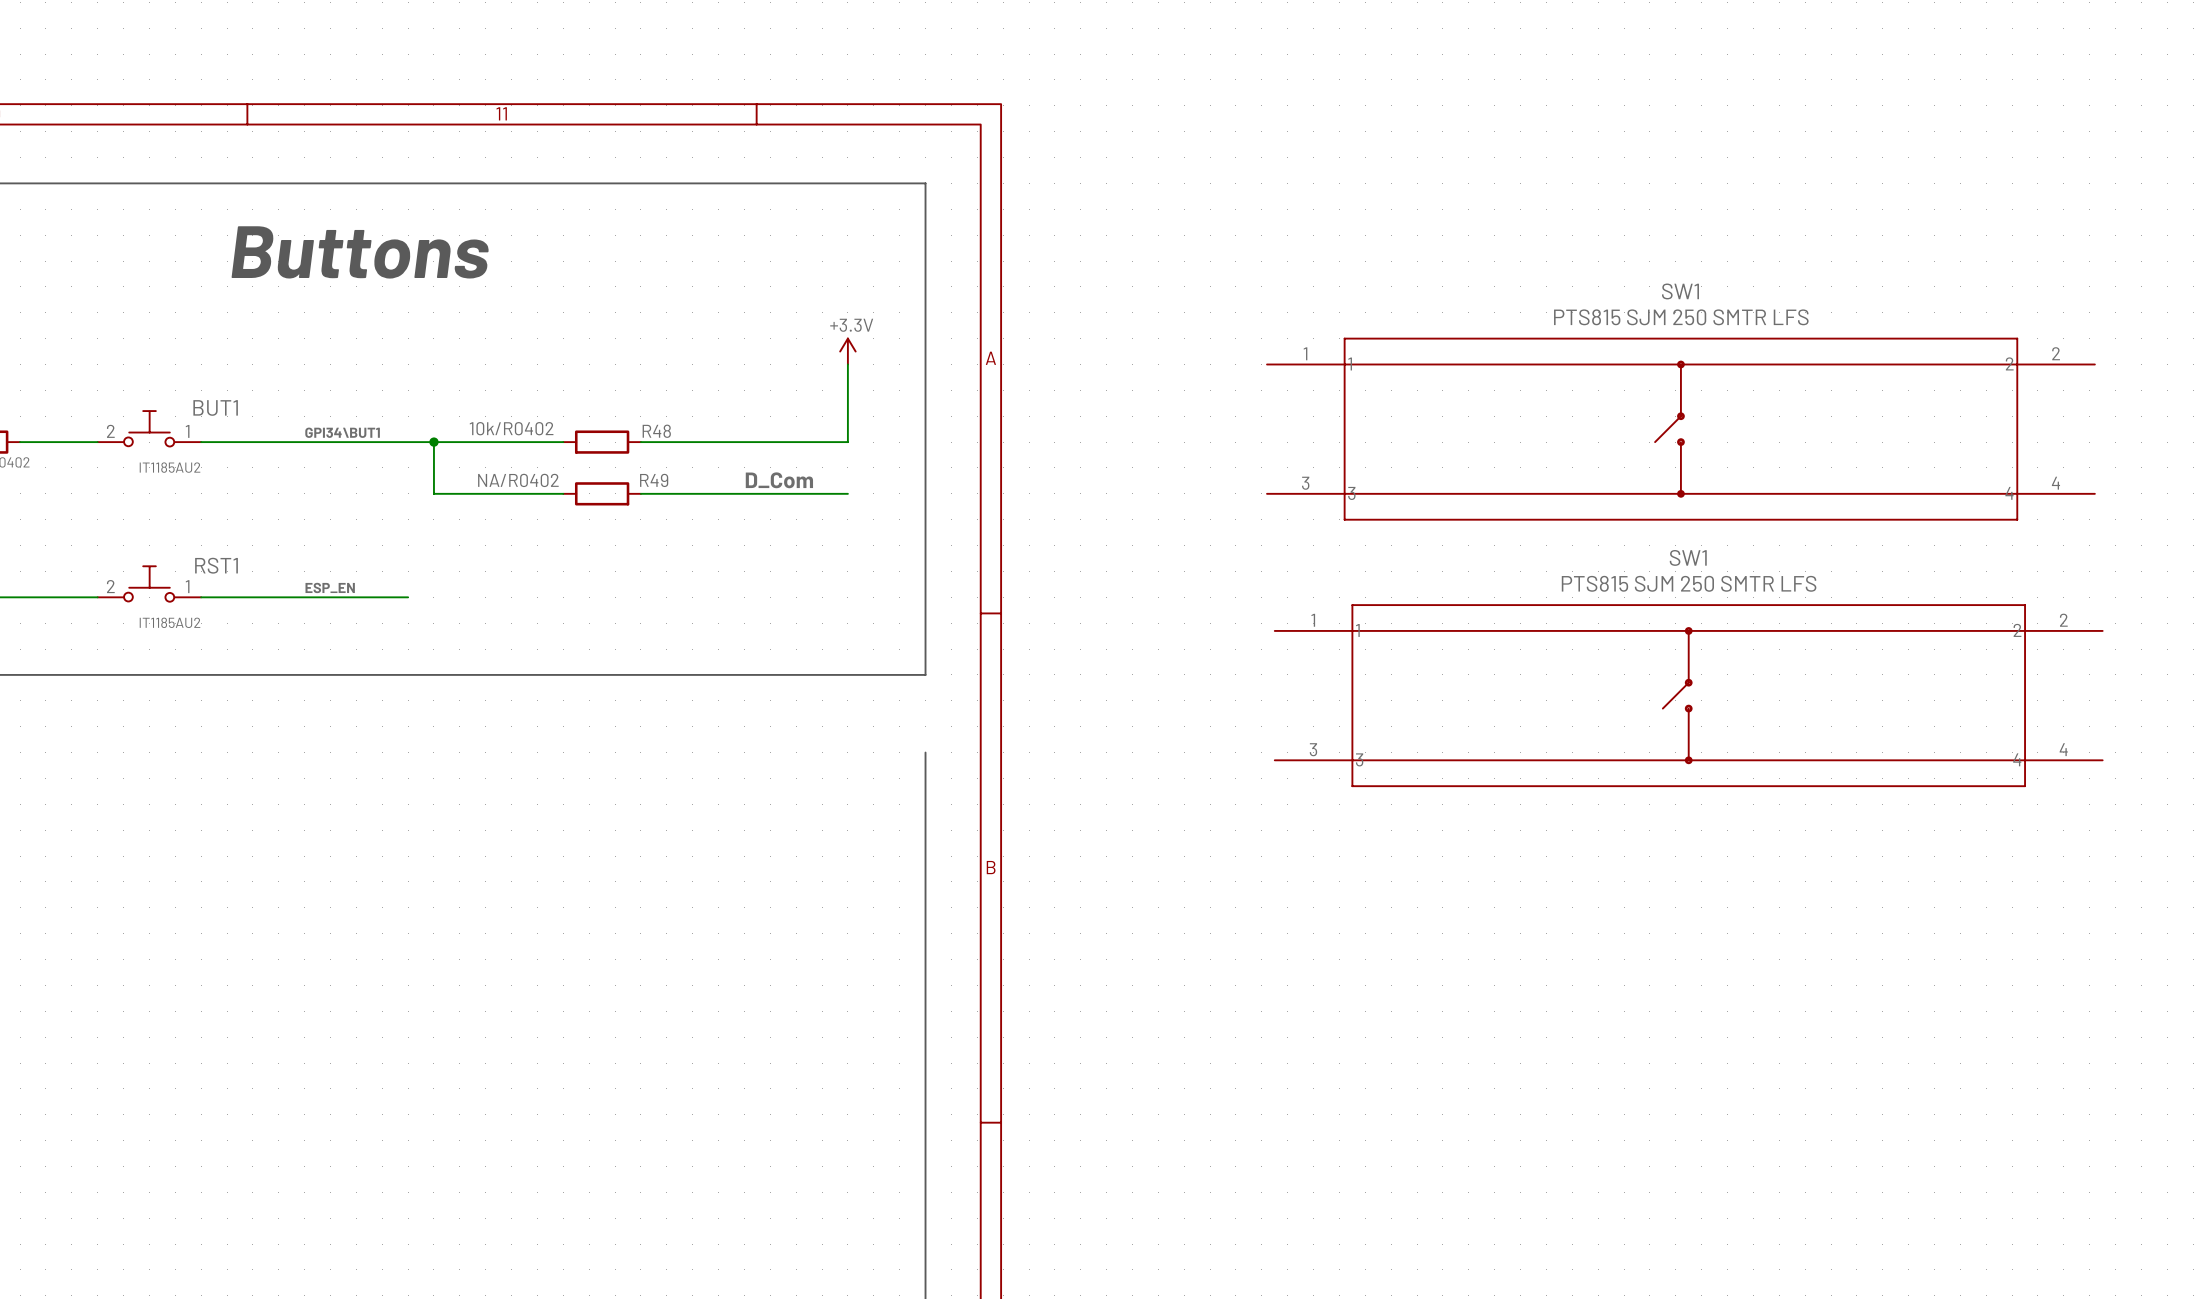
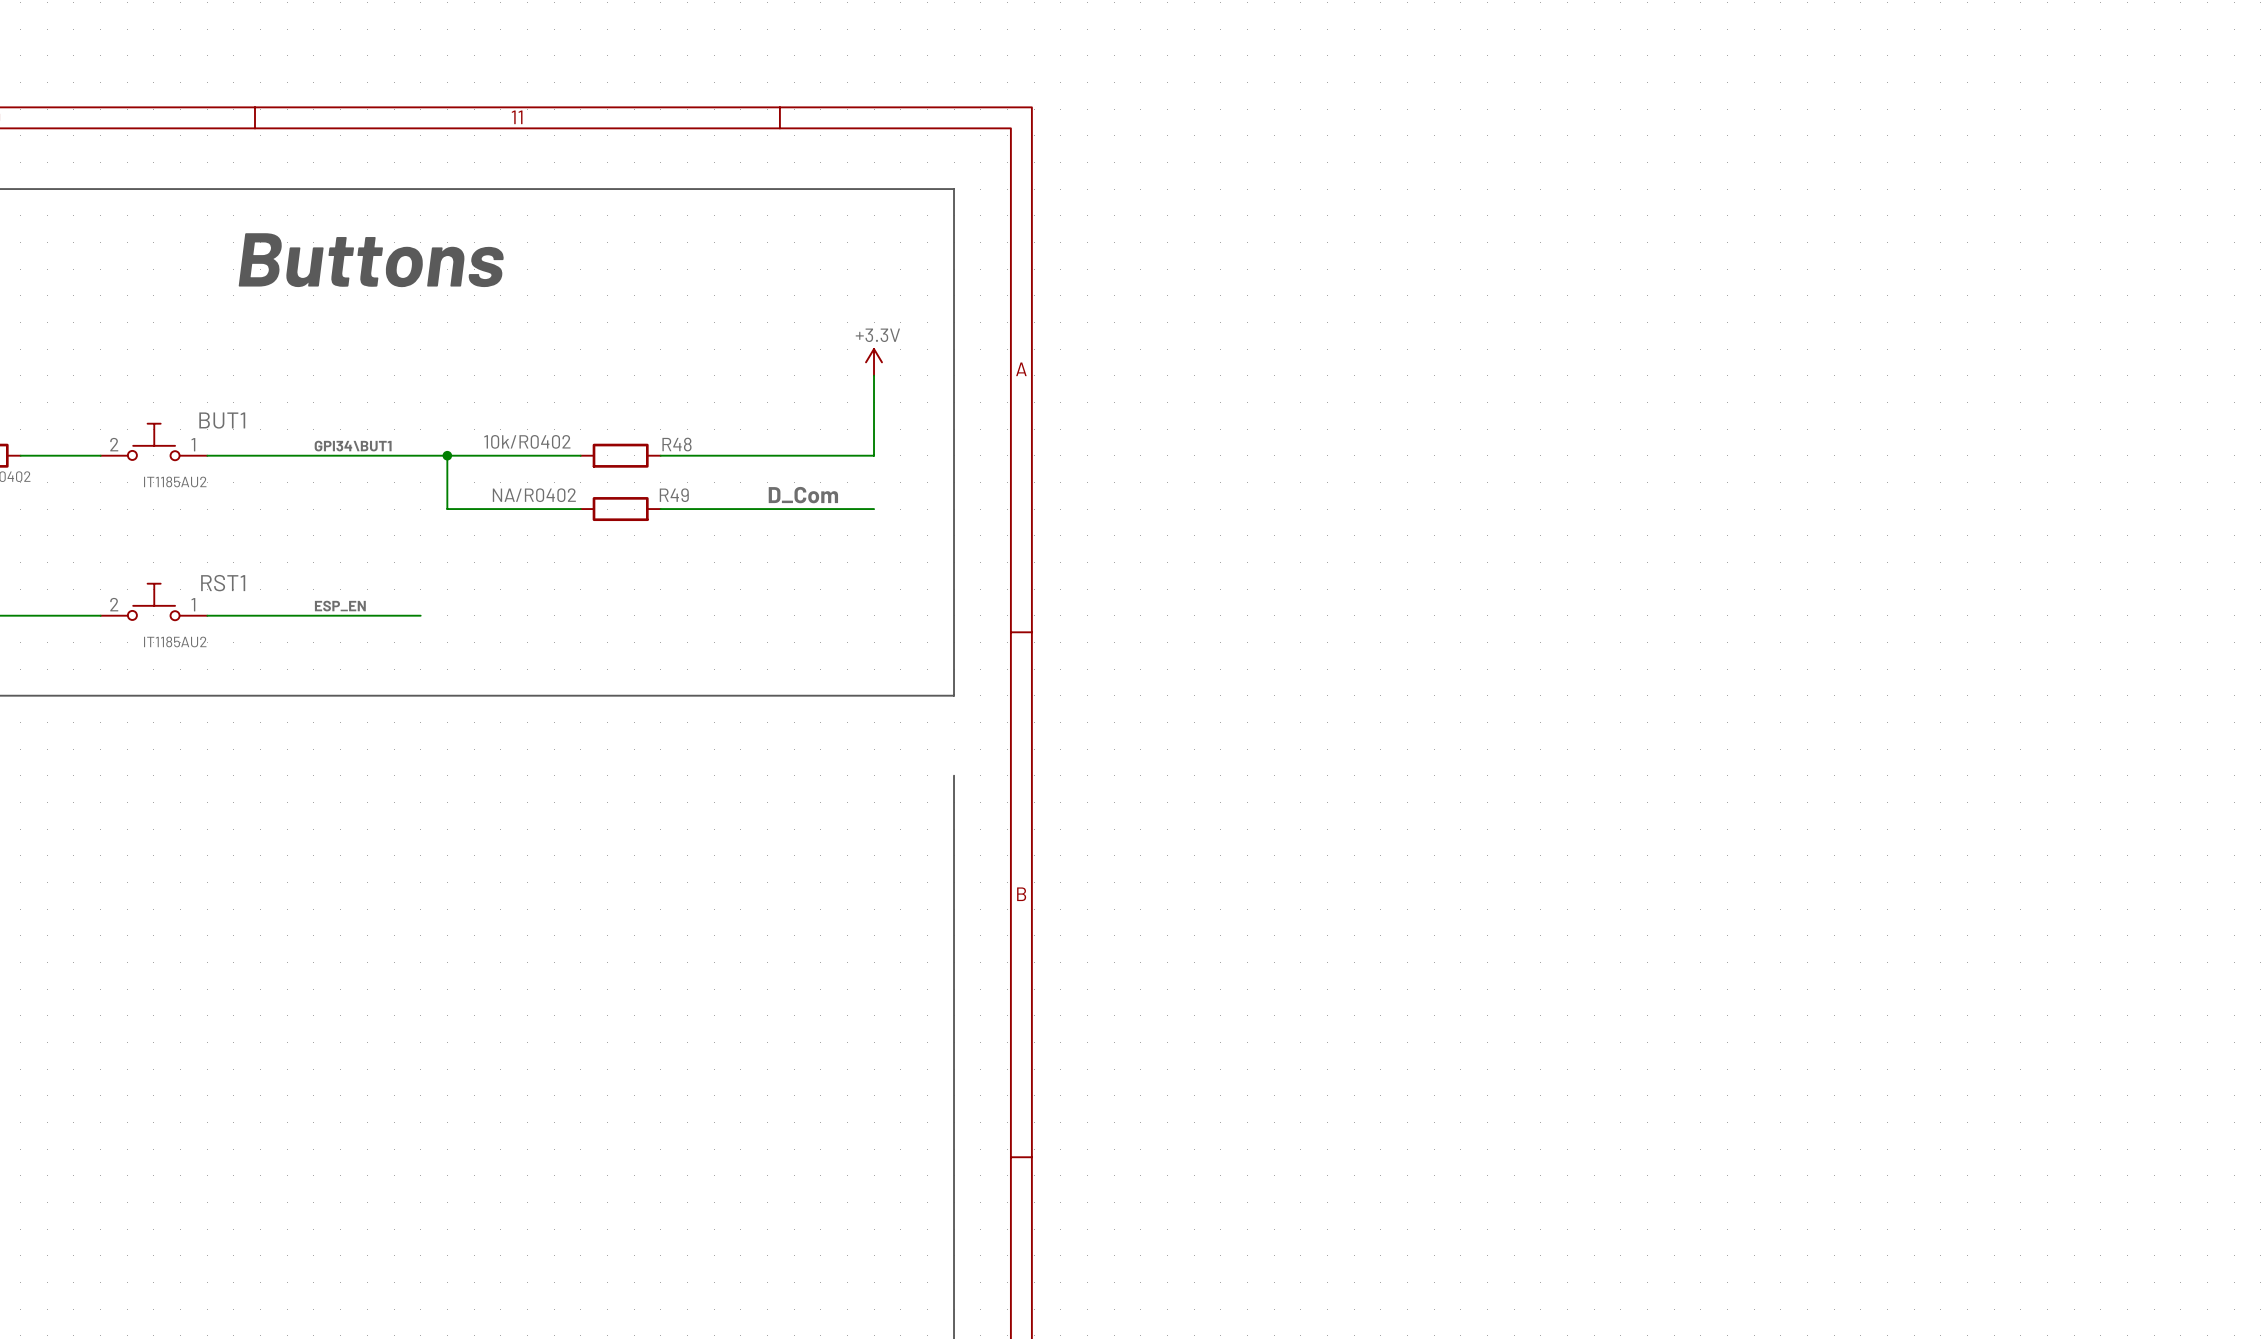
SW1: PTS815 SJM 250 SMTR LFS (1680, 429) -> none
SW1: PTS815 SJM 250 SMTR LFS (1688, 695) -> none

